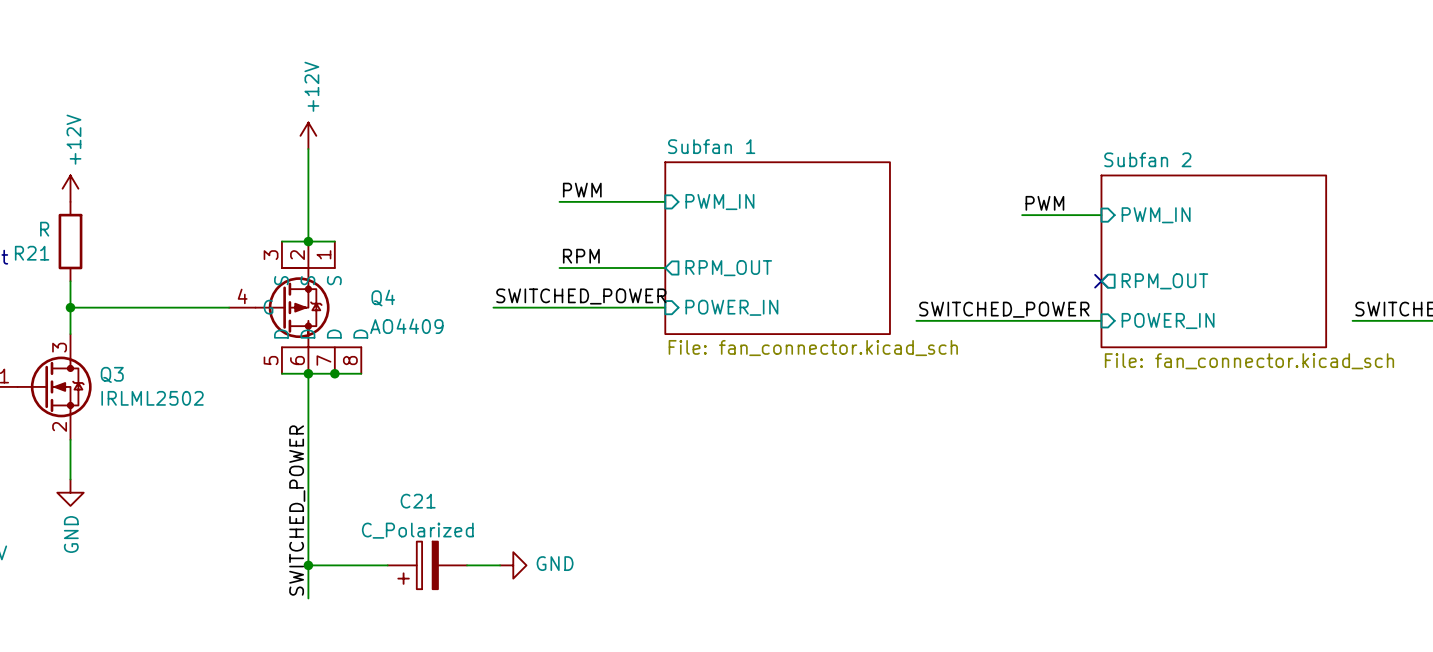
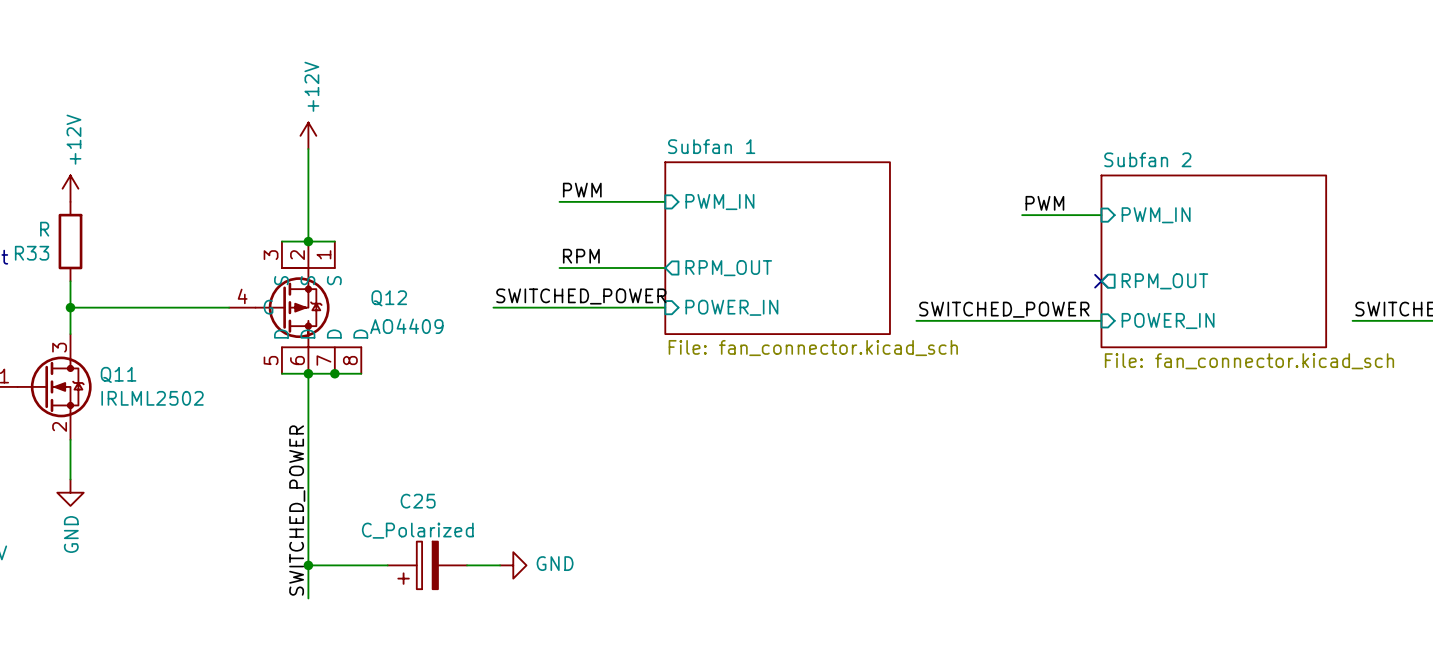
R21 name: R21 (32, 253) -> R33 (32, 253)
Q4 name: Q4 (383, 298) -> Q12 (389, 298)
Q3 name: Q3 (112, 374) -> Q11 (118, 374)
C21 name: C21 (418, 501) -> C25 (418, 501)

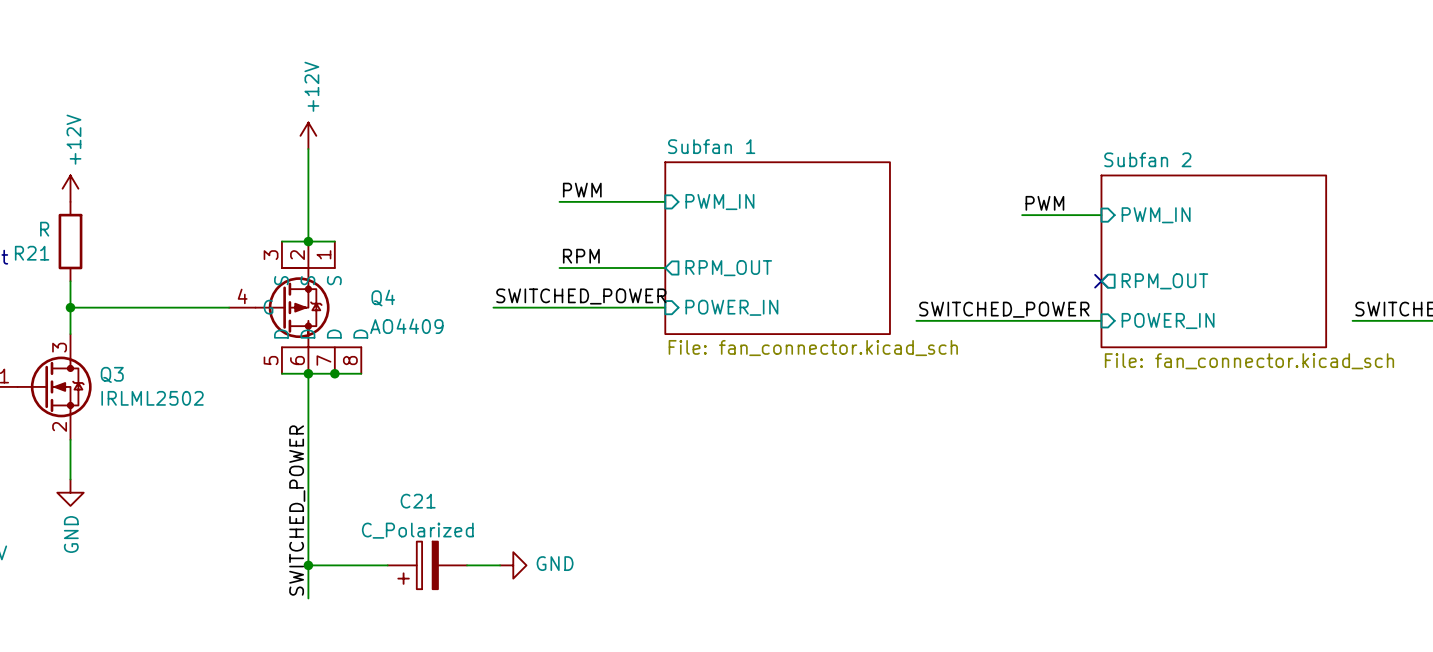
R33 name: R33 (32, 253) -> R21 (32, 253)
Q12 name: Q12 (389, 298) -> Q4 (383, 298)
Q11 name: Q11 (118, 374) -> Q3 (112, 374)
C25 name: C25 (418, 501) -> C21 (418, 501)

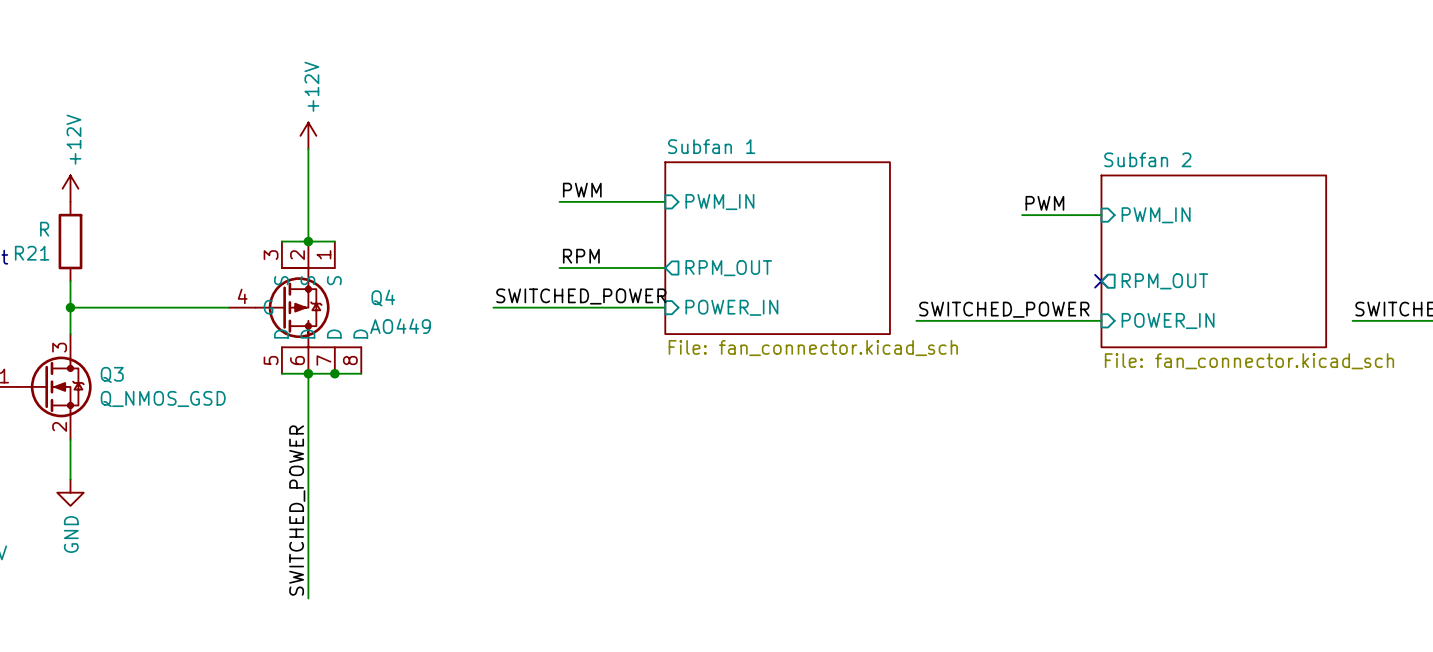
Q4 value: AO4409 (406, 326) -> AO449 (400, 326)
Q3 value: IRLML2502 (152, 398) -> Q_NMOS_GSD (163, 398)
wire: (308, 565) (387, 565) -> none
junction: (308, 565) -> none
C21: C_Polarized (427, 565) -> none
wire: (467, 565) (500, 565) -> none
power symbol: GND (513, 565) -> none

